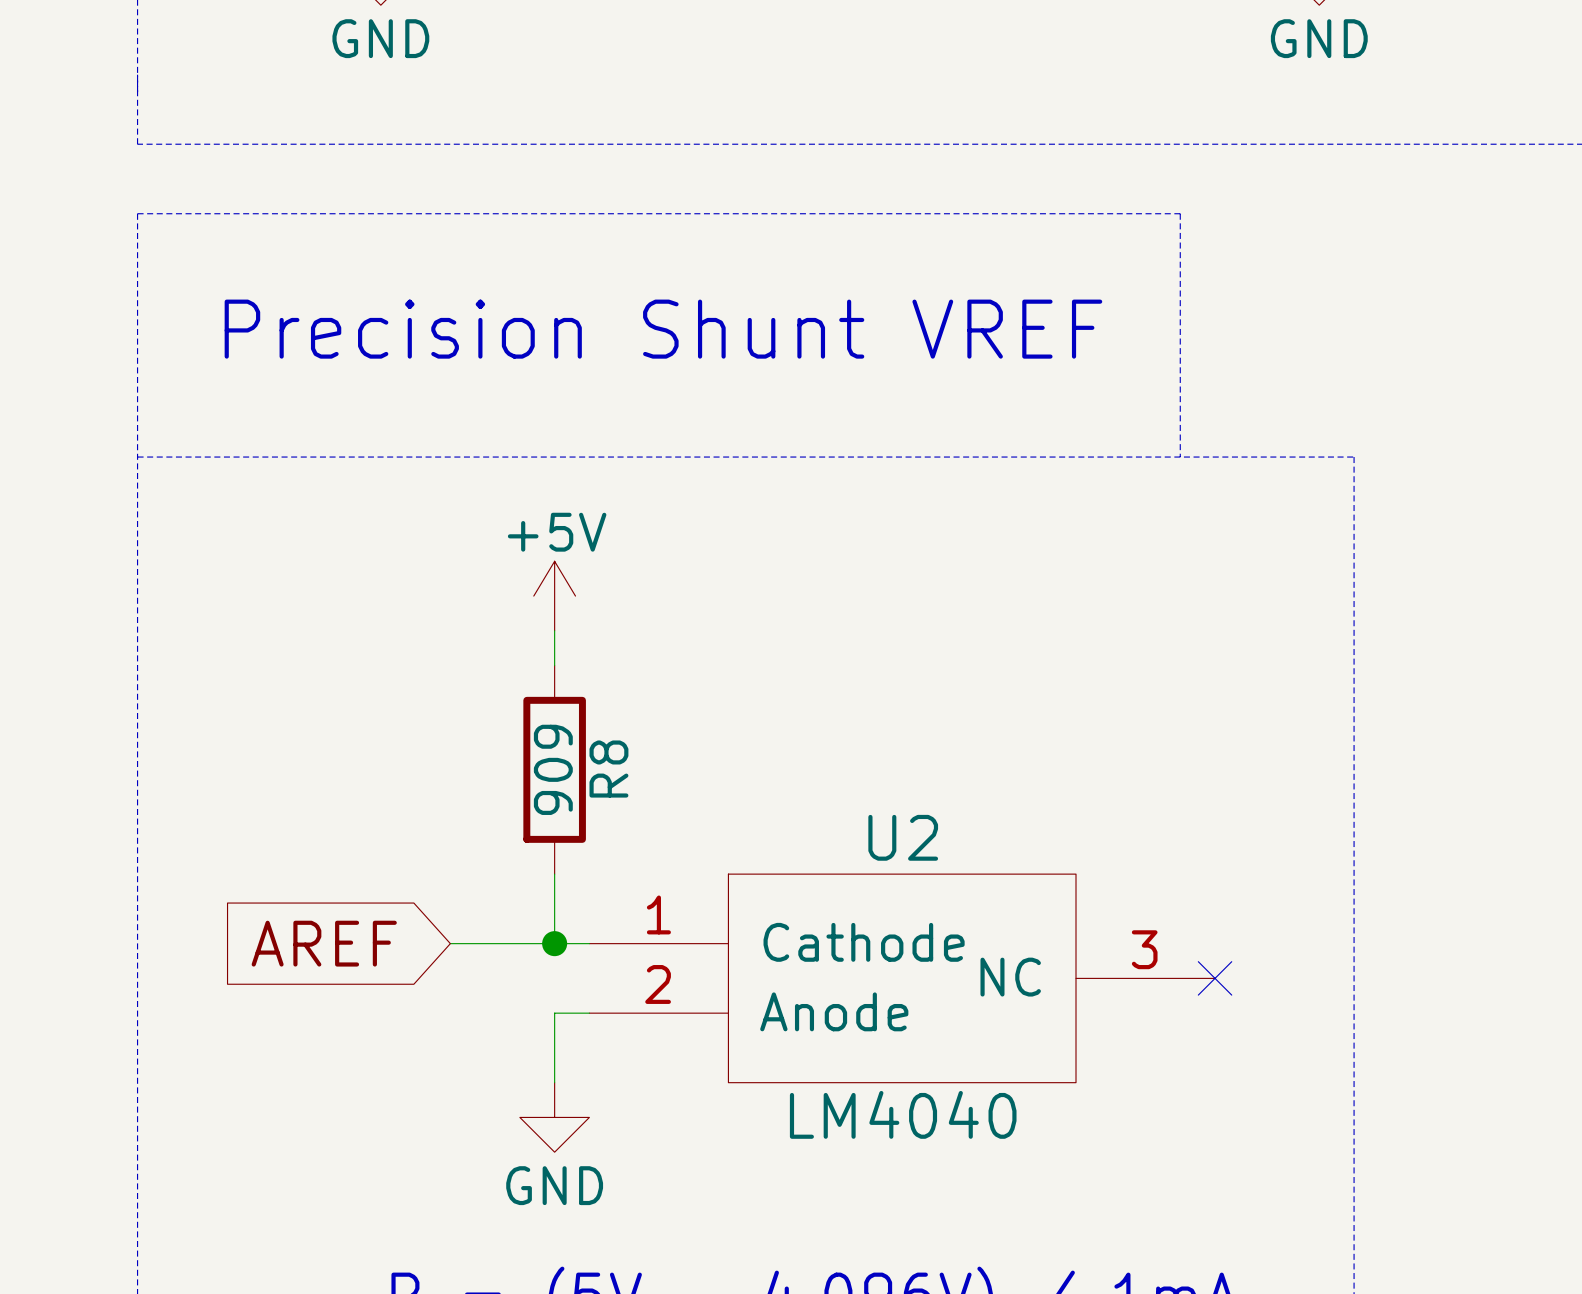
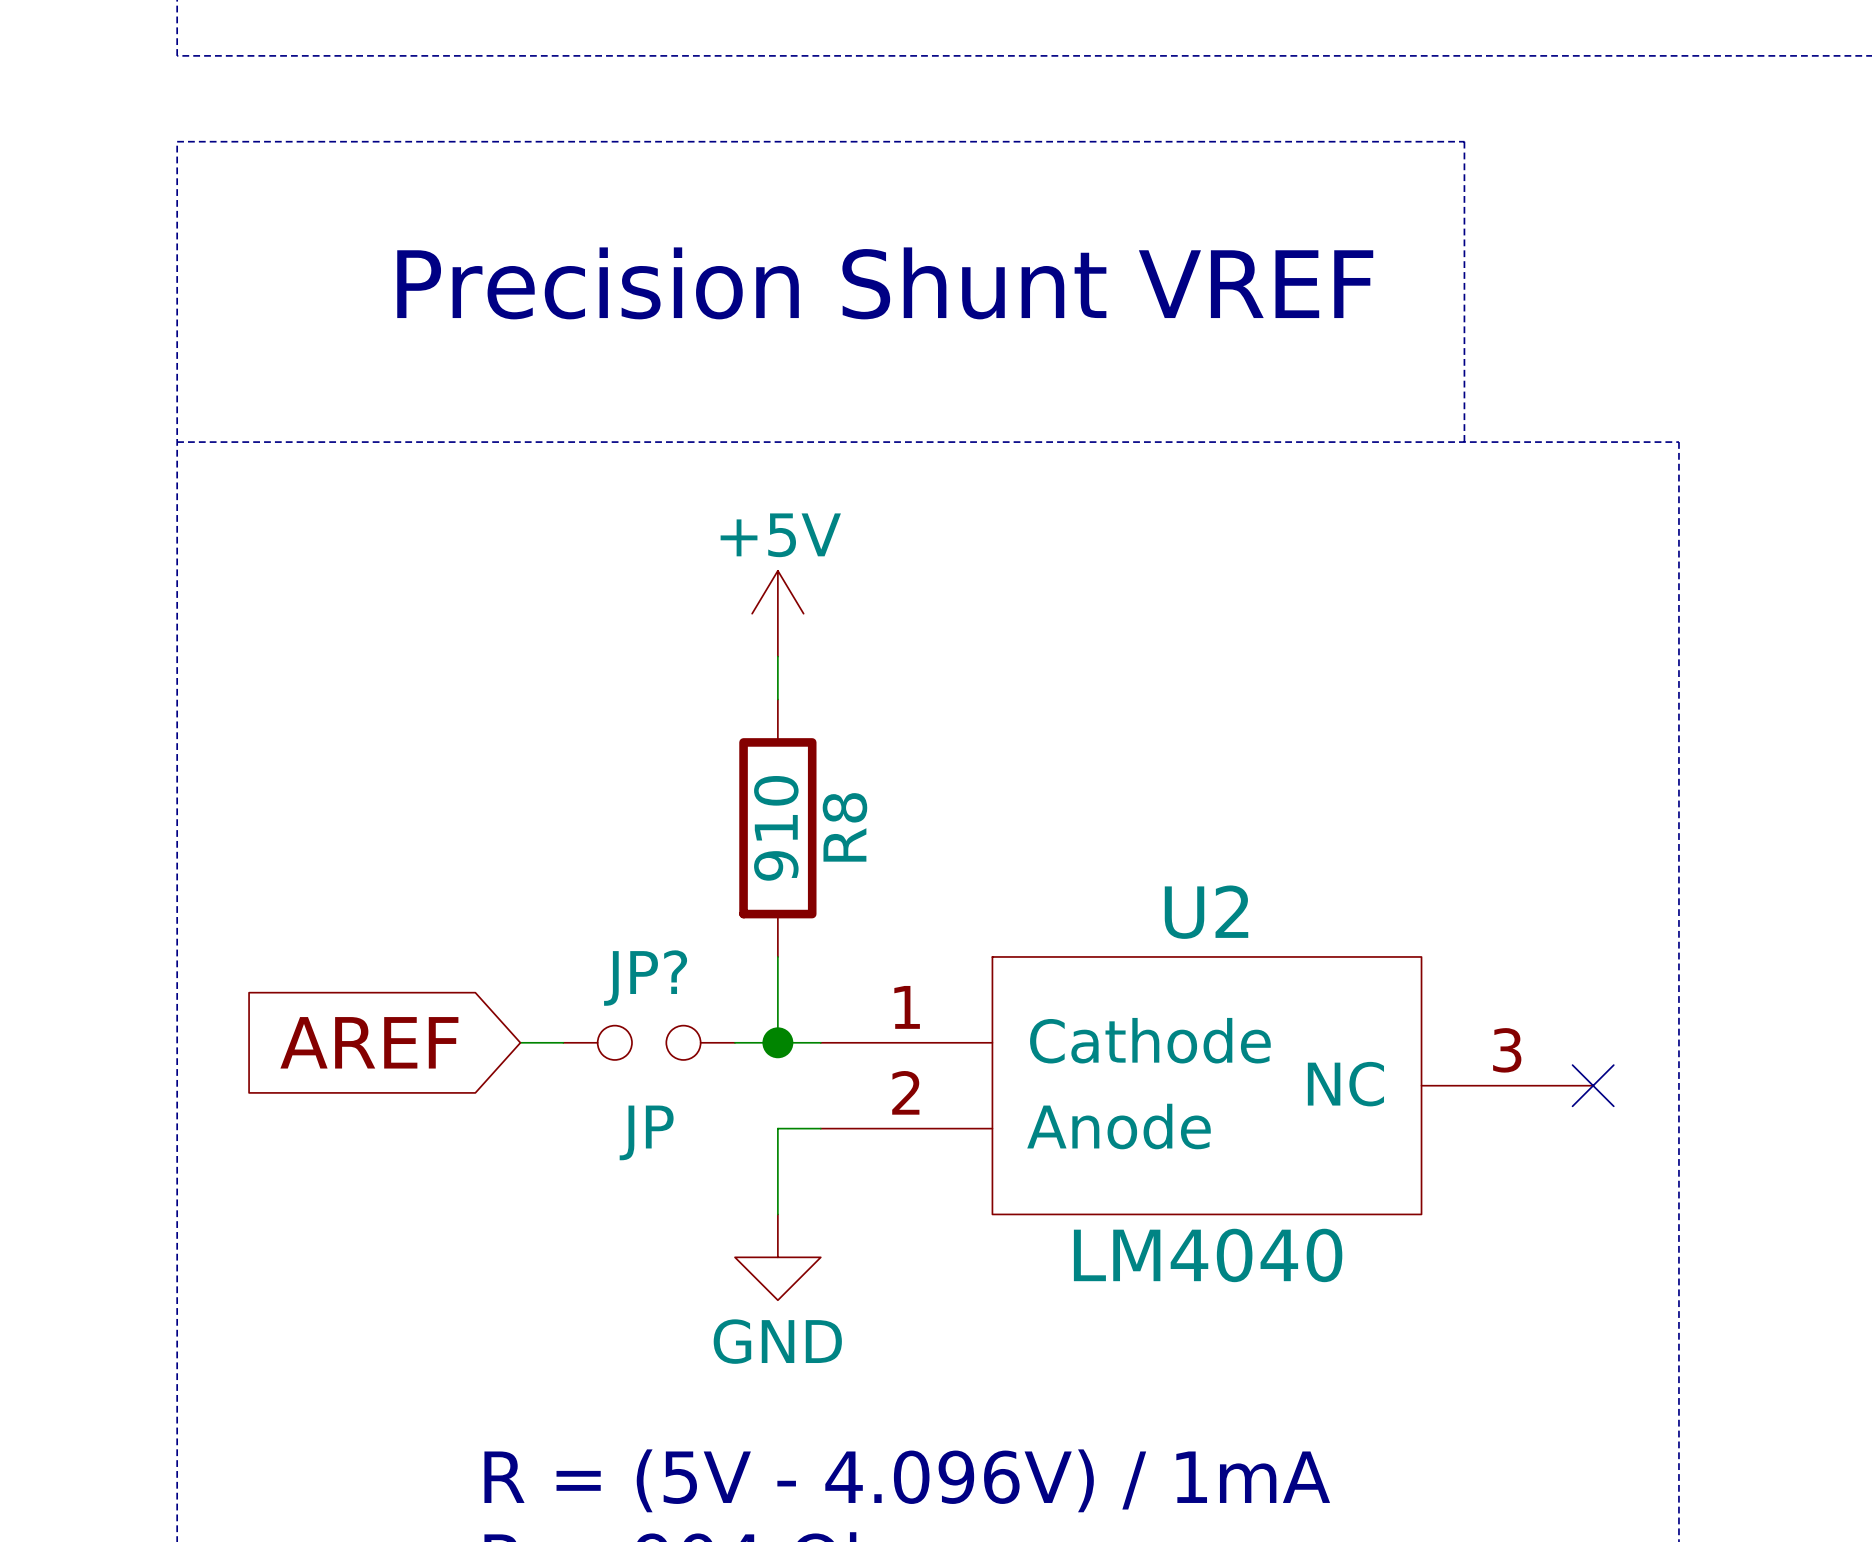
power symbol position: +5V (554, 596) -> +5V (777, 613)
wire: (554, 630) (554, 665) -> (777, 656) (777, 699)
R8 value: 909 (553, 769) -> 910 (776, 828)
R8 position: (554, 769) -> (777, 828)
wire: (554, 874) (554, 943) -> (777, 956) (777, 1042)
global label position: AREF (324, 943) -> AREF (369, 1042)
wire: (450, 943) (589, 943) -> (563, 1042) (520, 1042)
JP?: none -> JP (649, 1042)
junction position: (554, 943) -> (777, 1042)
U2 position: (902, 978) -> (1206, 1085)
no-connect mark position: (1215, 978) -> (1593, 1085)
wire: (589, 1013) (554, 1013) (554, 1082) -> (820, 1128) (777, 1128) (777, 1214)
power symbol position: GND (554, 1117) -> GND (777, 1257)

